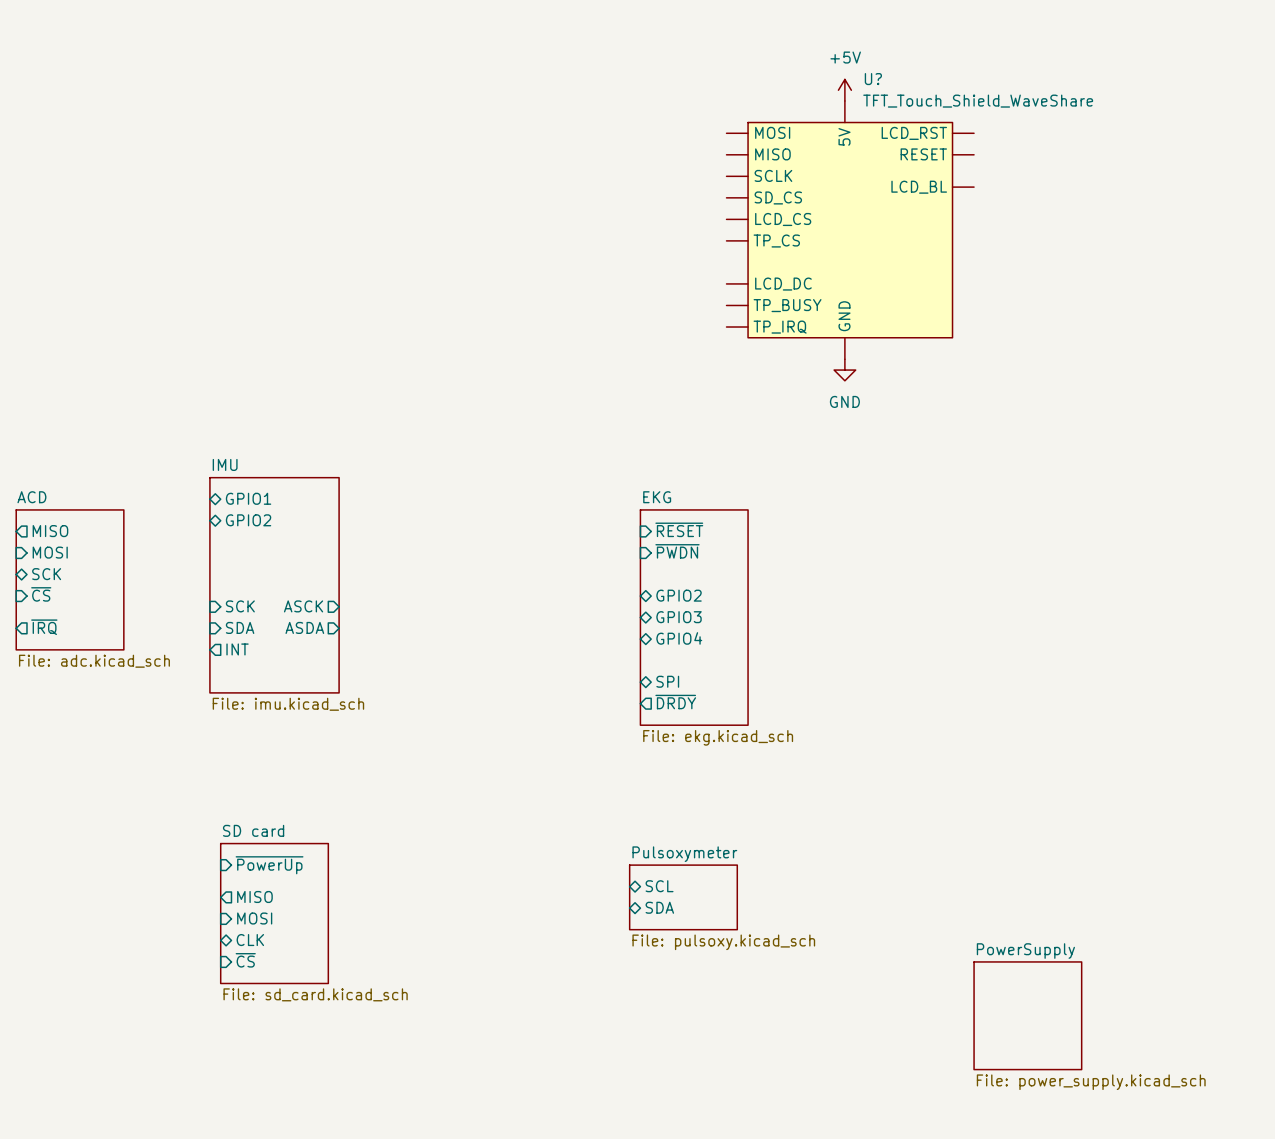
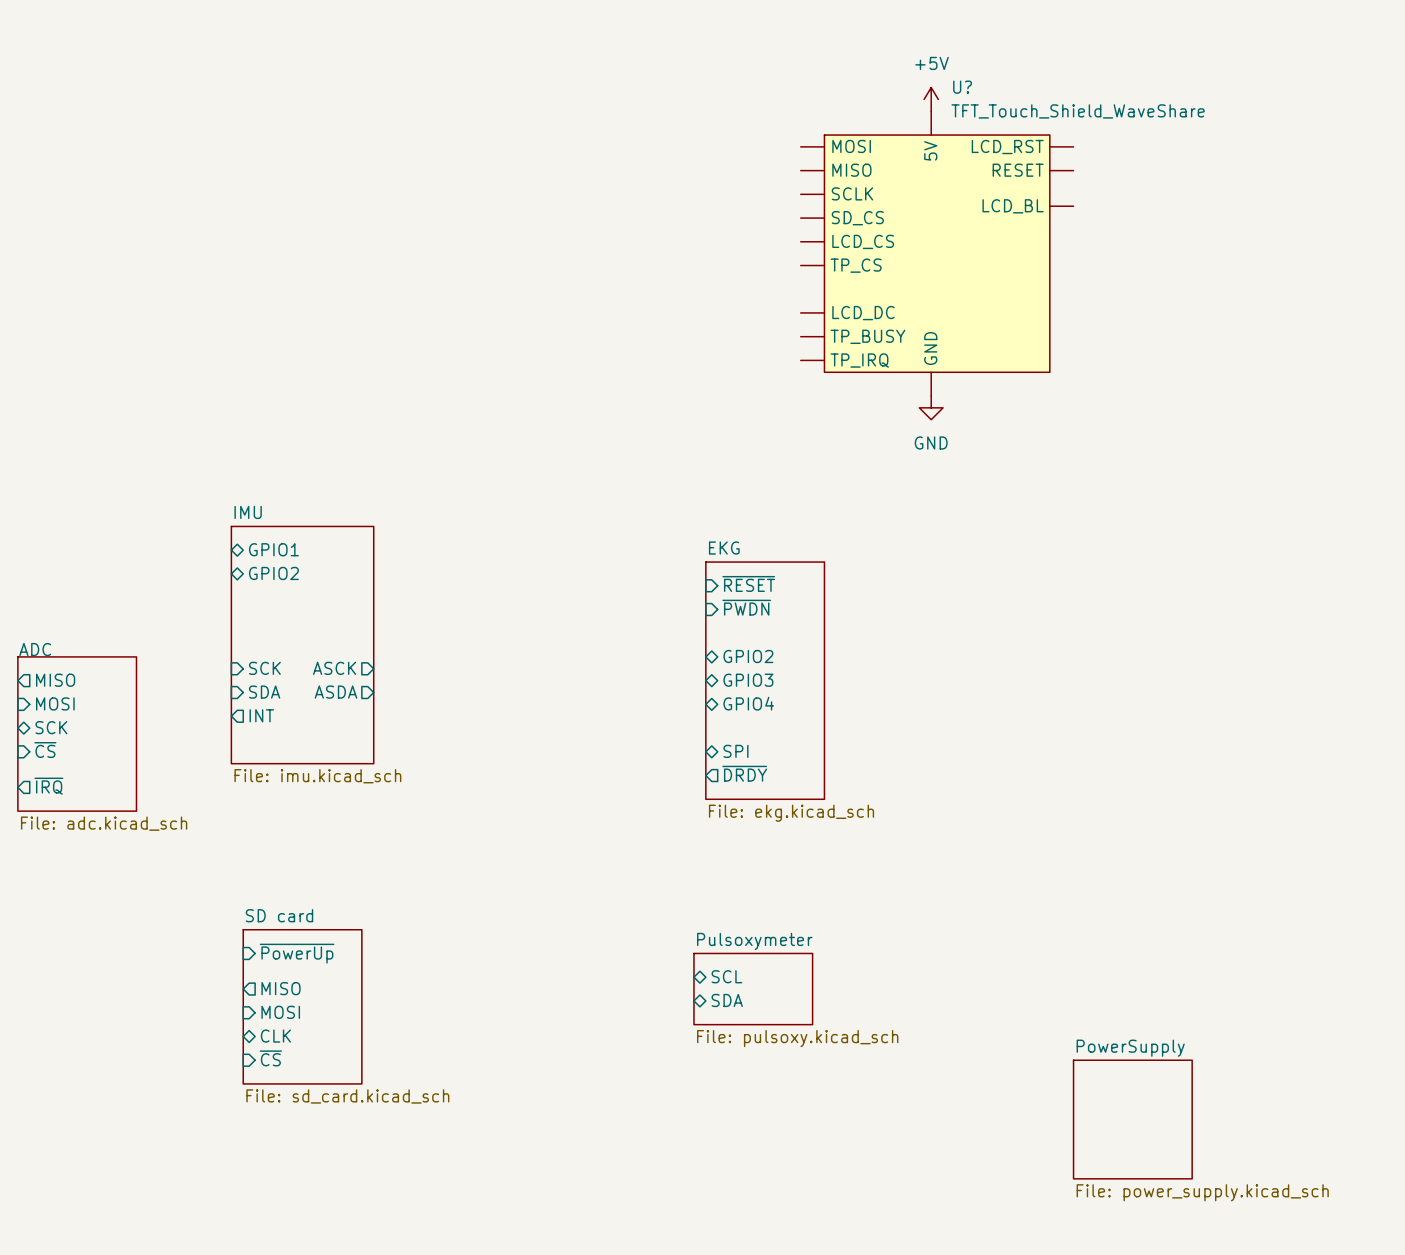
sheet pin position: MISO (50, 531) -> MISO (55, 680)
sheet pin position: MOSI (50, 552) -> MOSI (55, 703)
sheet pin position: SCK (46, 574) -> SCK (51, 727)
sheet ACD: File: adc.kicad_sch (70, 579) -> none
sheet pin position: ~{CS} (41, 594) -> ~{CS} (45, 750)
sheet pin position: ~{IRQ} (44, 627) -> ~{IRQ} (48, 786)
sheet ADC: none -> File: adc.kicad_sch (77, 734)

